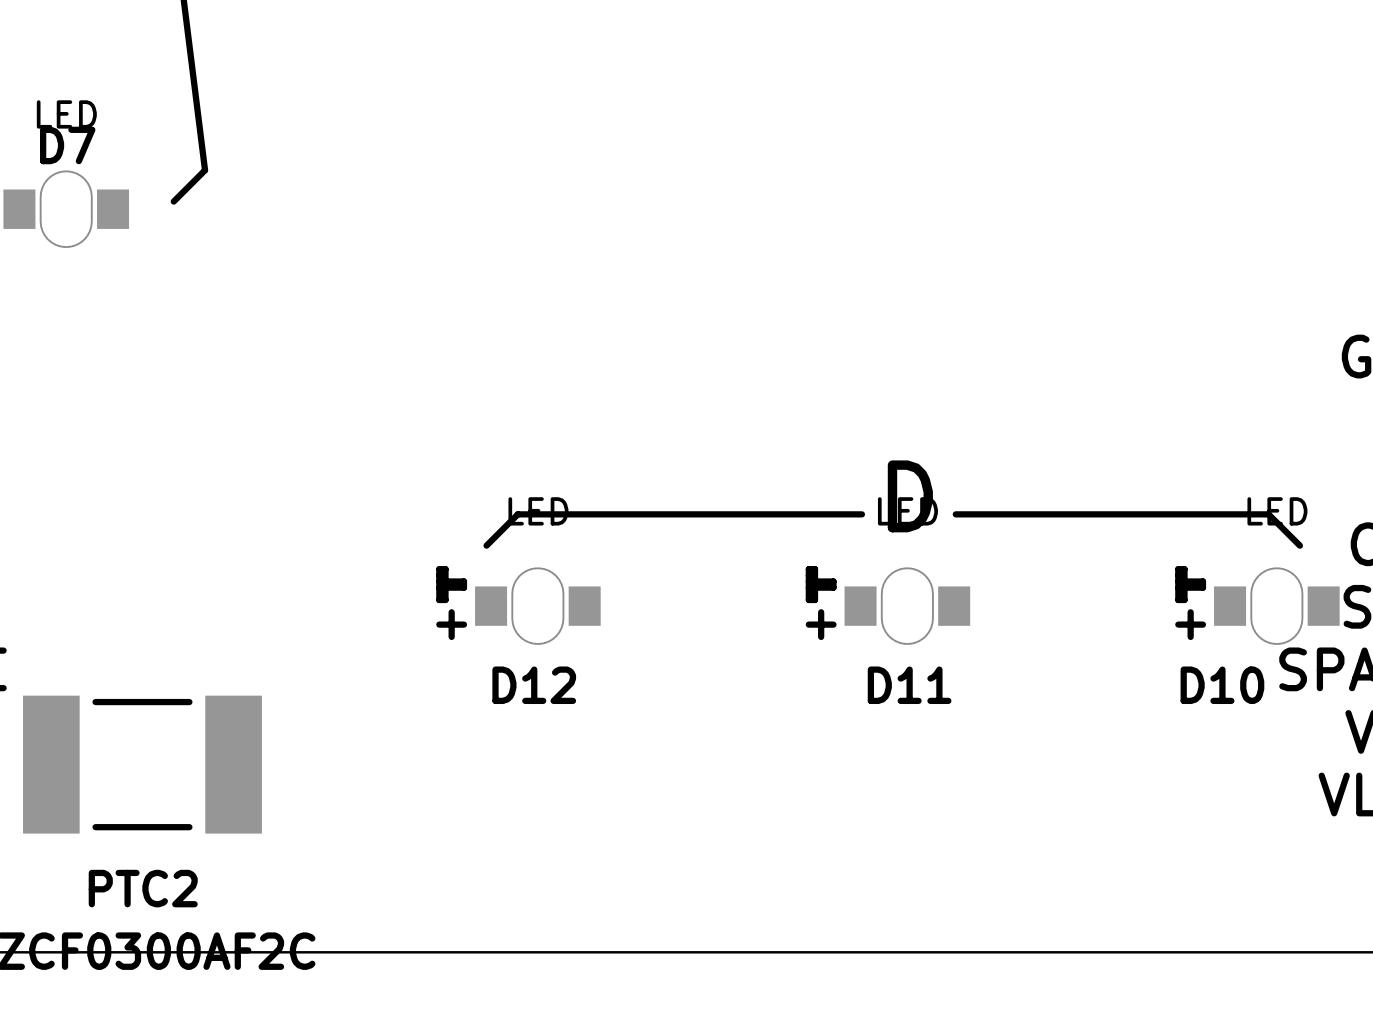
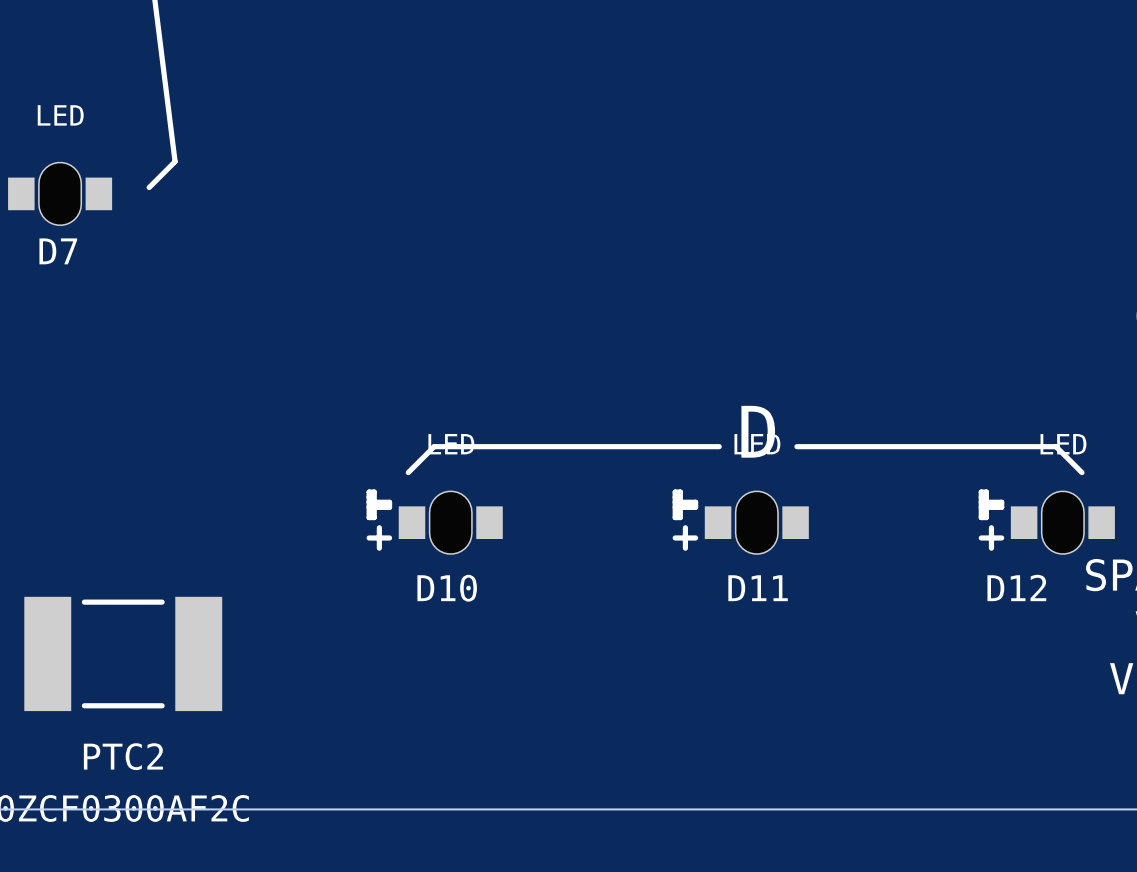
D7 name position: D7 (67, 145) -> D7 (58, 251)
D12 name: D12 (534, 685) -> D10 (447, 588)
D10 name: D10 (1222, 685) -> D12 (1016, 587)

